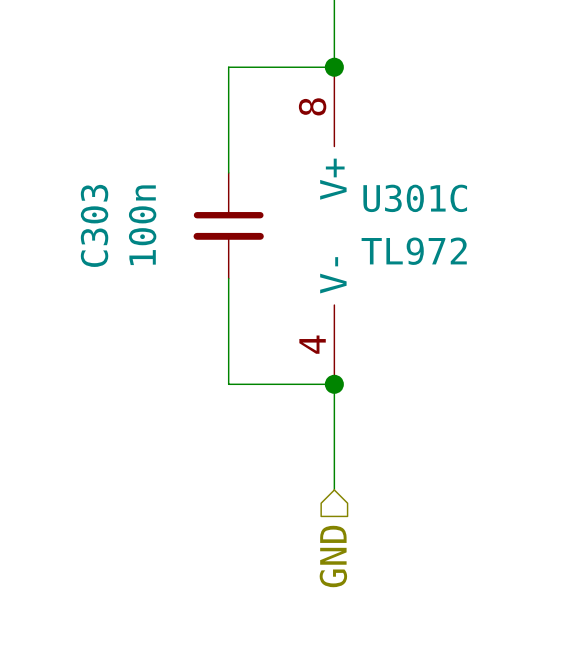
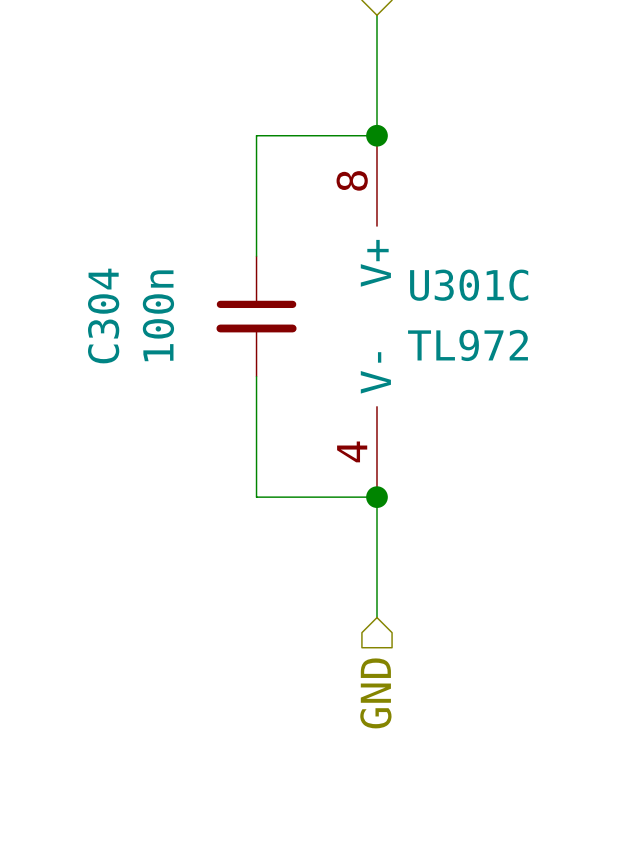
C303 name: C303 (94, 225) -> C304 (103, 316)

